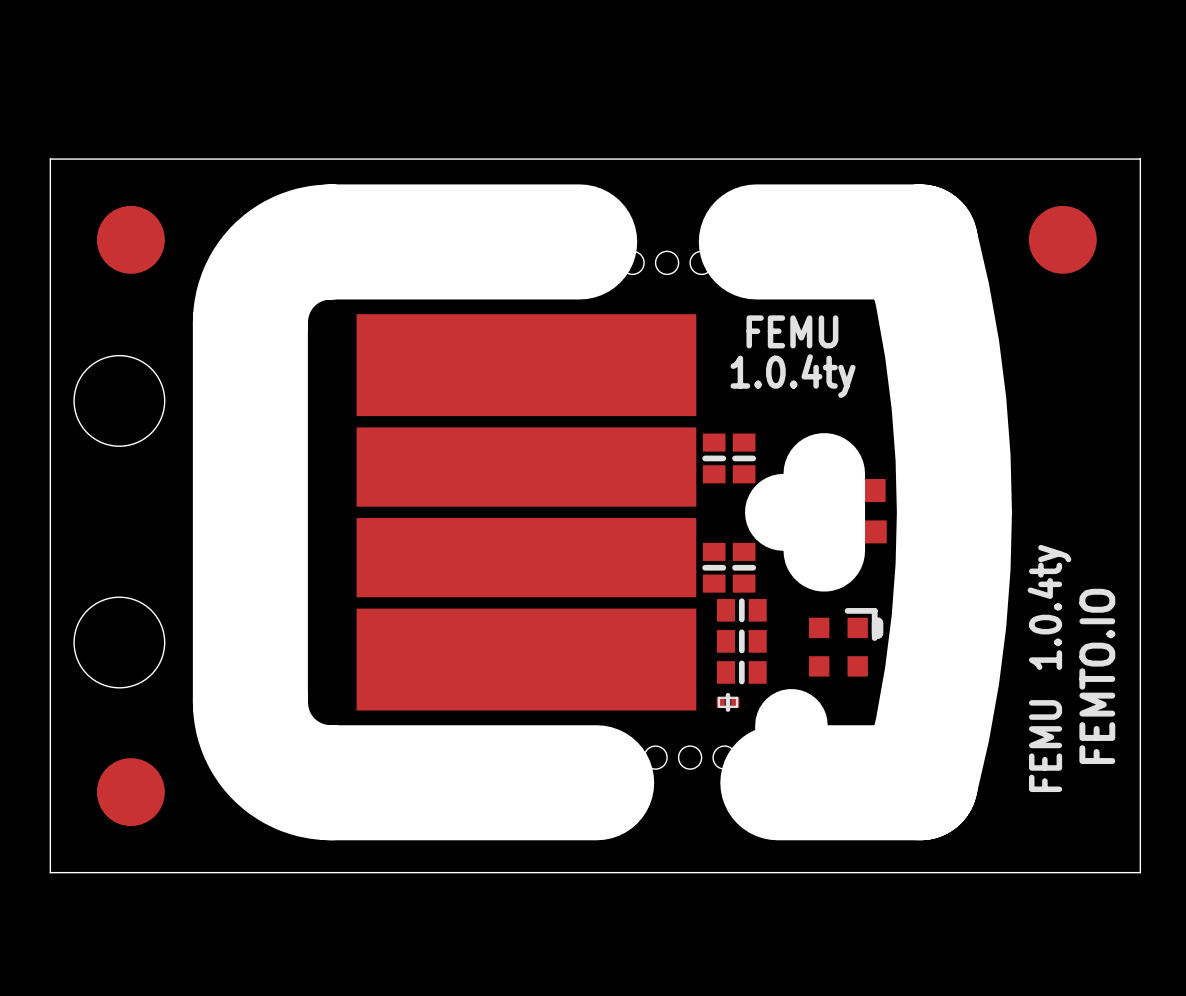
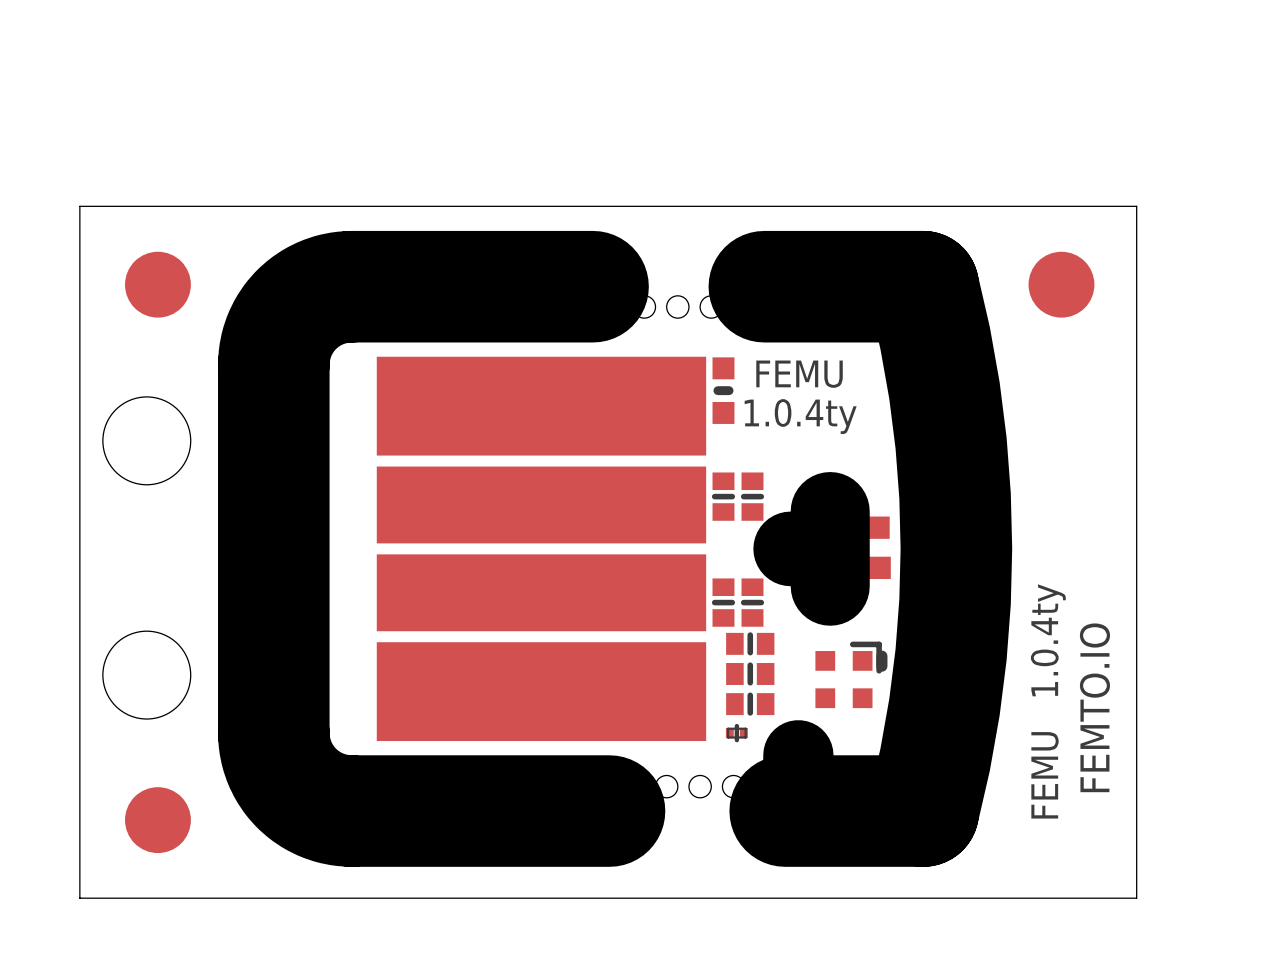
part: none -> (723, 390)

